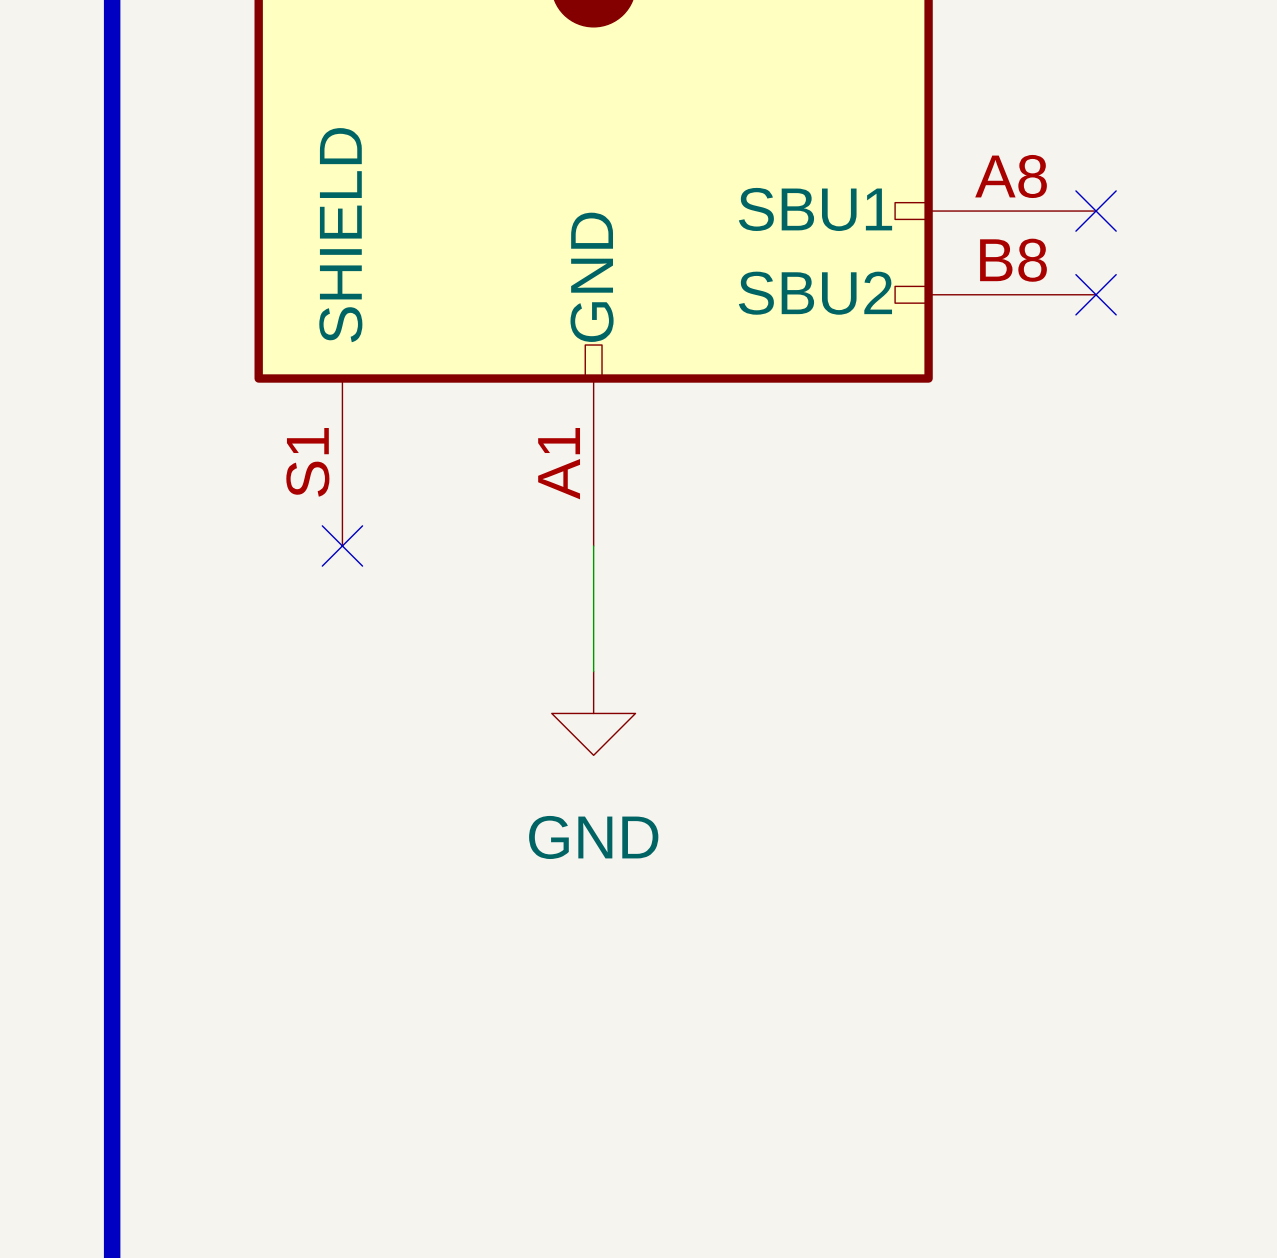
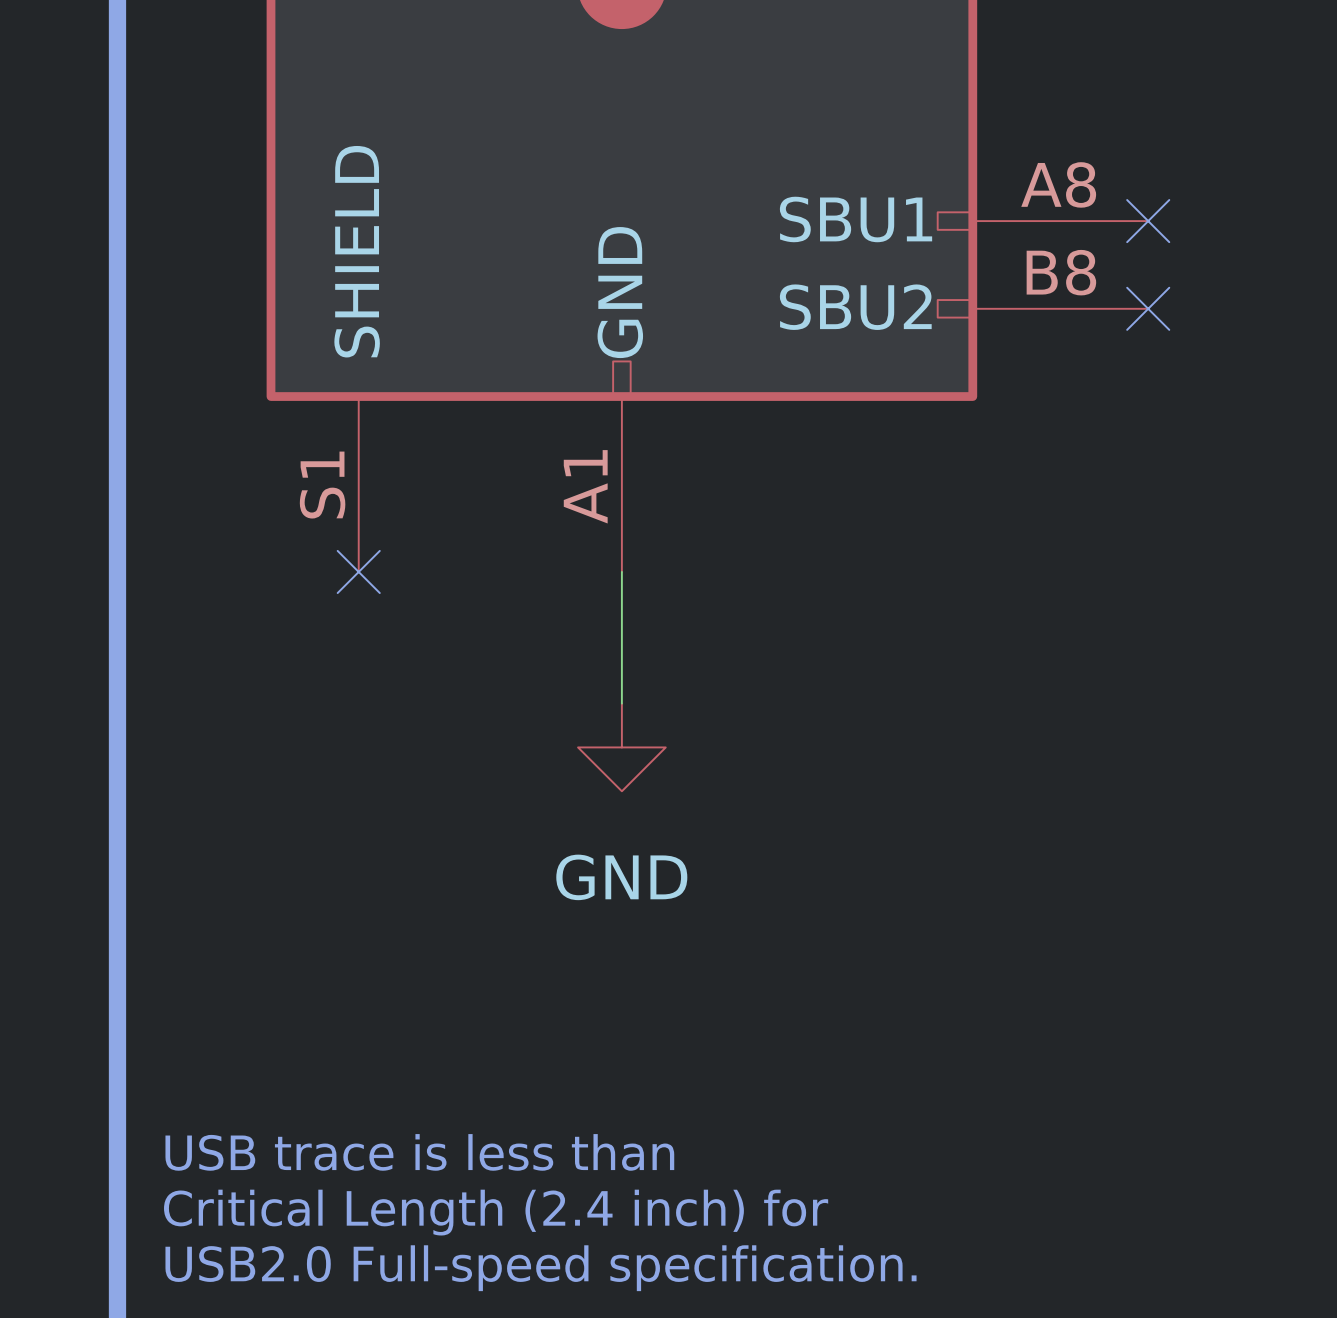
text: none -> USB trace is less than (419, 1152)
text: none -> Critical Length (2.4 inch) for (496, 1212)
text: none -> USB2.0 Full-speed specification. (541, 1268)

